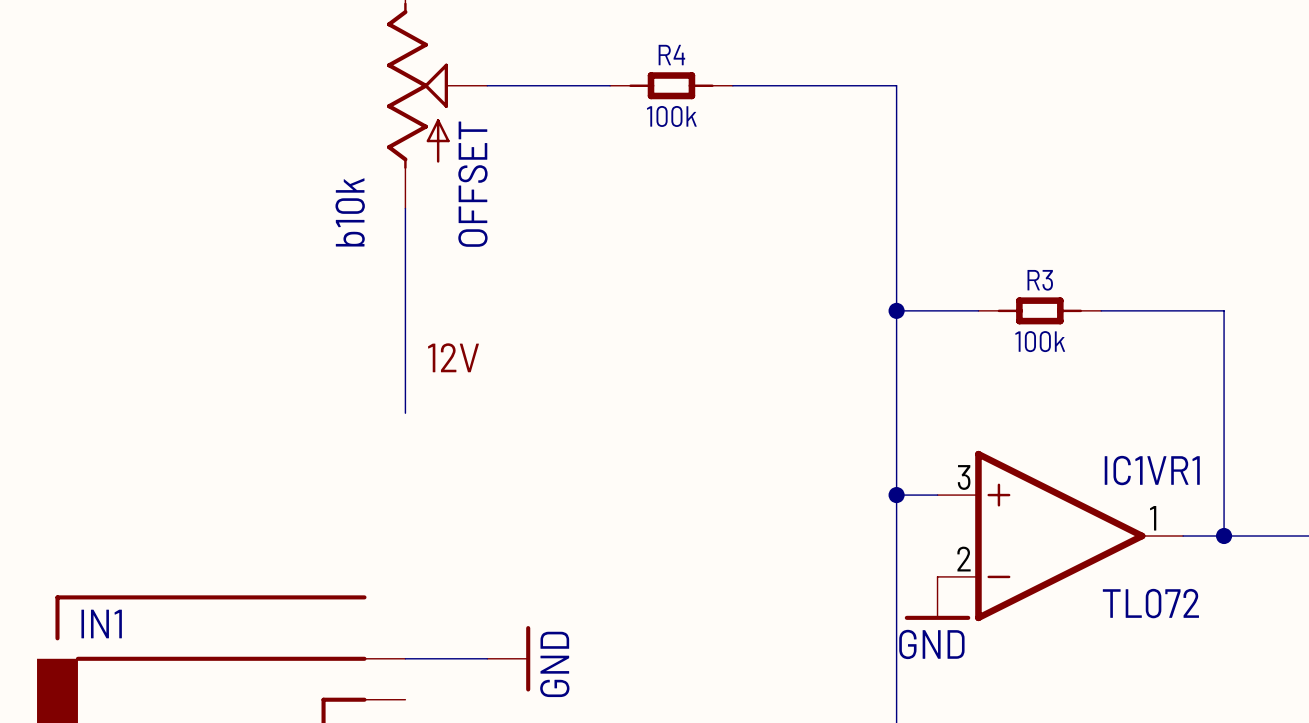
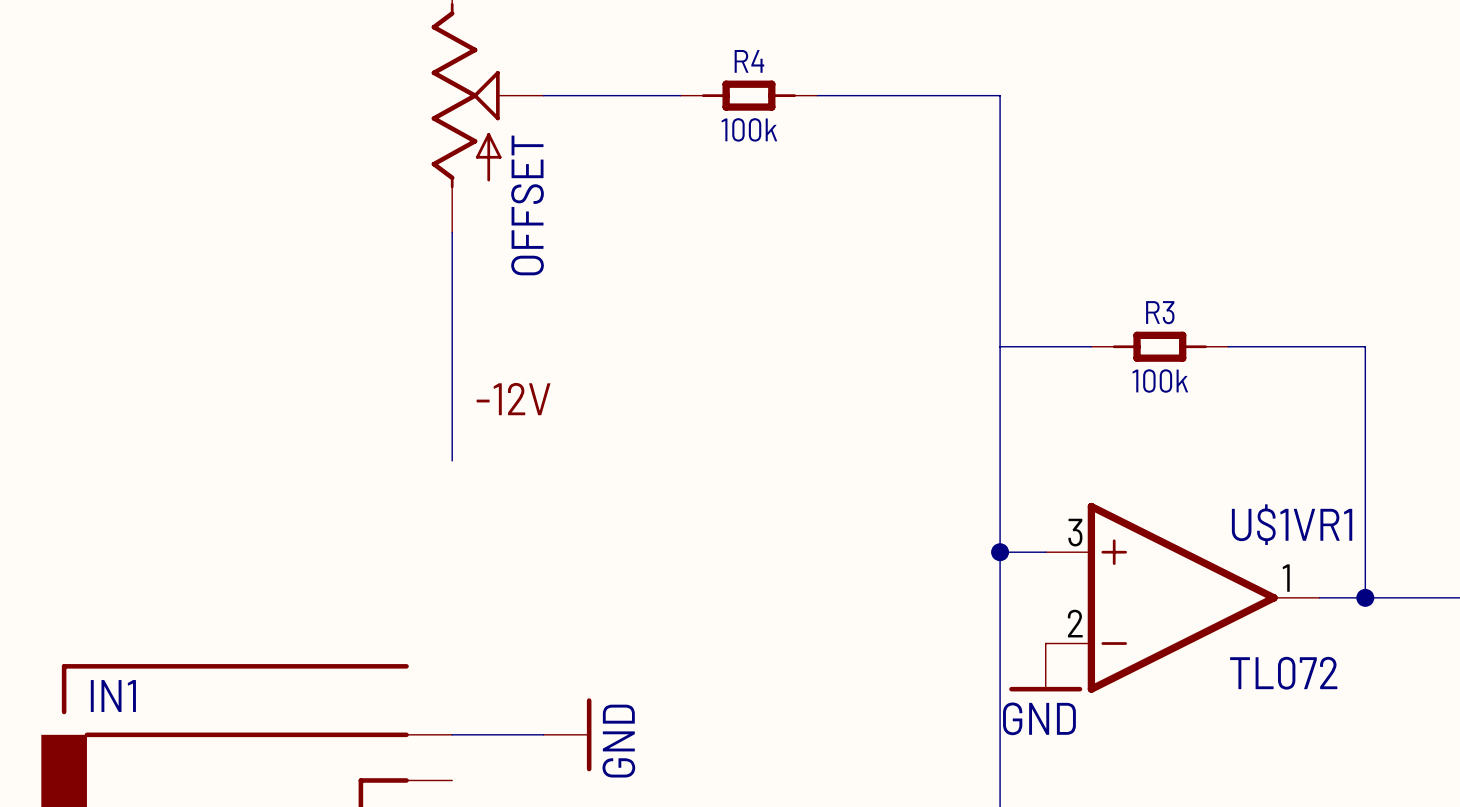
OFFSET value: b10k (350, 212) -> none
junction: (896, 310) -> none
label: 12V (453, 357) -> -12V (513, 399)
IC1VR1 name: IC1VR1 (1152, 470) -> U$1VR1 (1292, 524)

